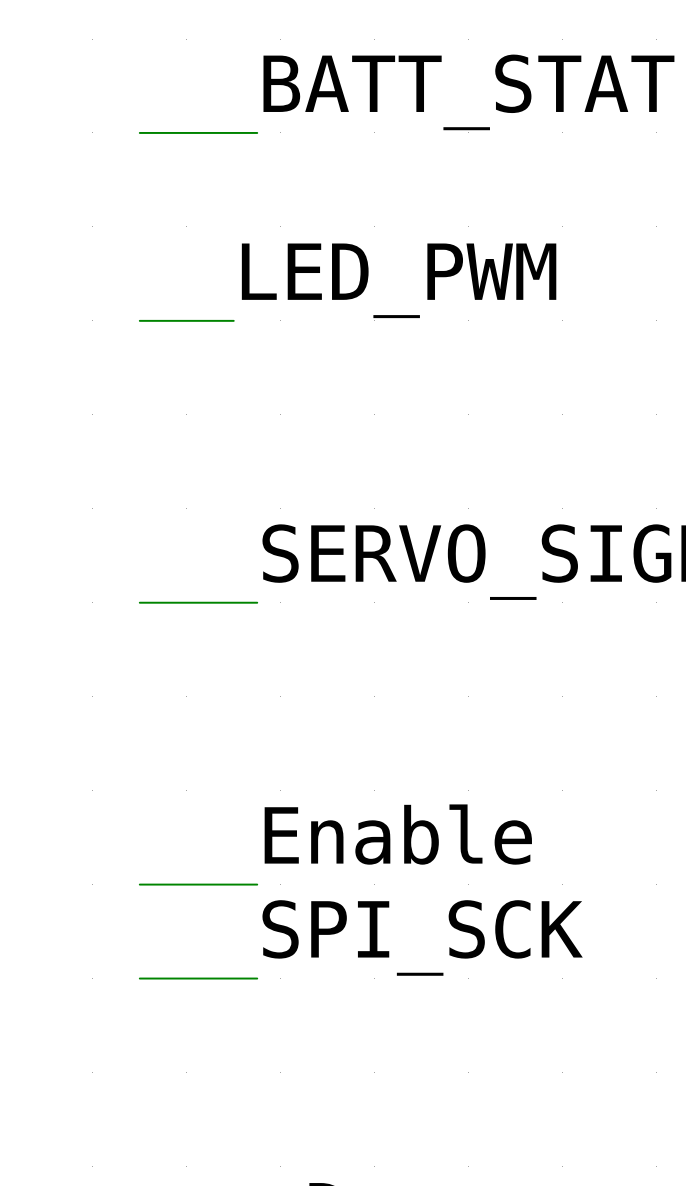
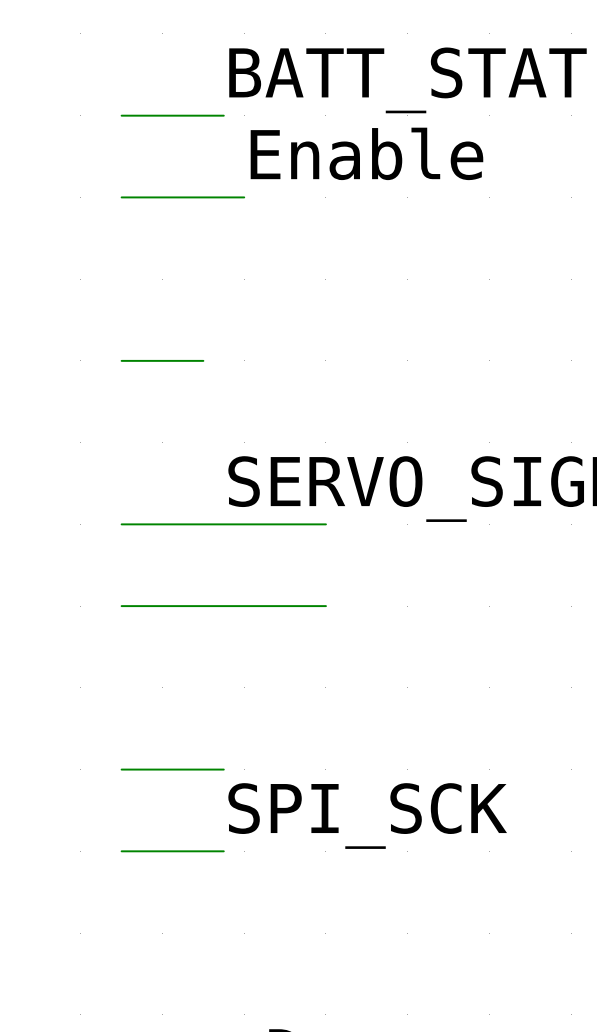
wire: none -> (121, 197) (244, 197)
label: LED_PWM (399, 280) -> none
wire: (139, 320) (233, 320) -> (121, 360) (203, 360)
wire: none -> (223, 524) (325, 524)
wire: none -> (121, 606) (325, 606)
label position: Enable (398, 834) -> Enable (366, 153)

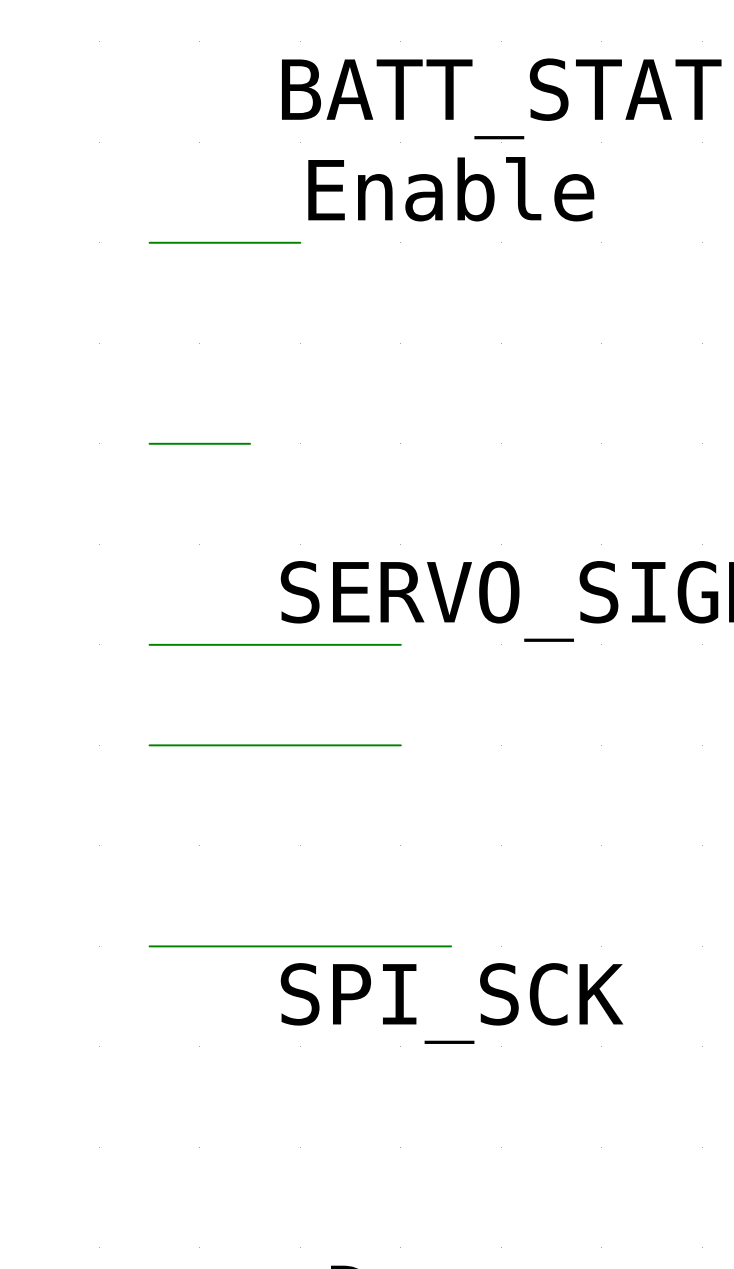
wire: (121, 115) (223, 115) -> none
wire: none -> (275, 946) (451, 946)
wire: (121, 851) (223, 851) -> none

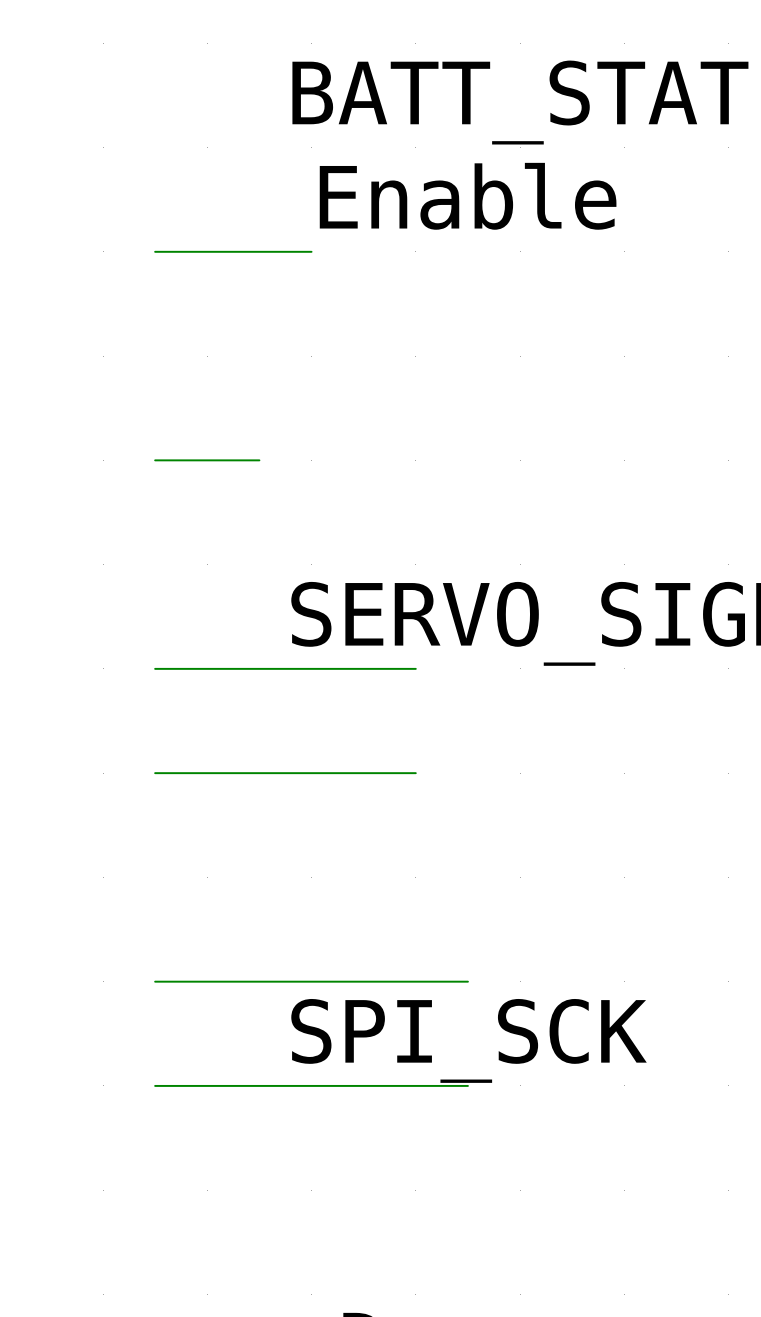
wire: none -> (155, 1085) (467, 1085)

